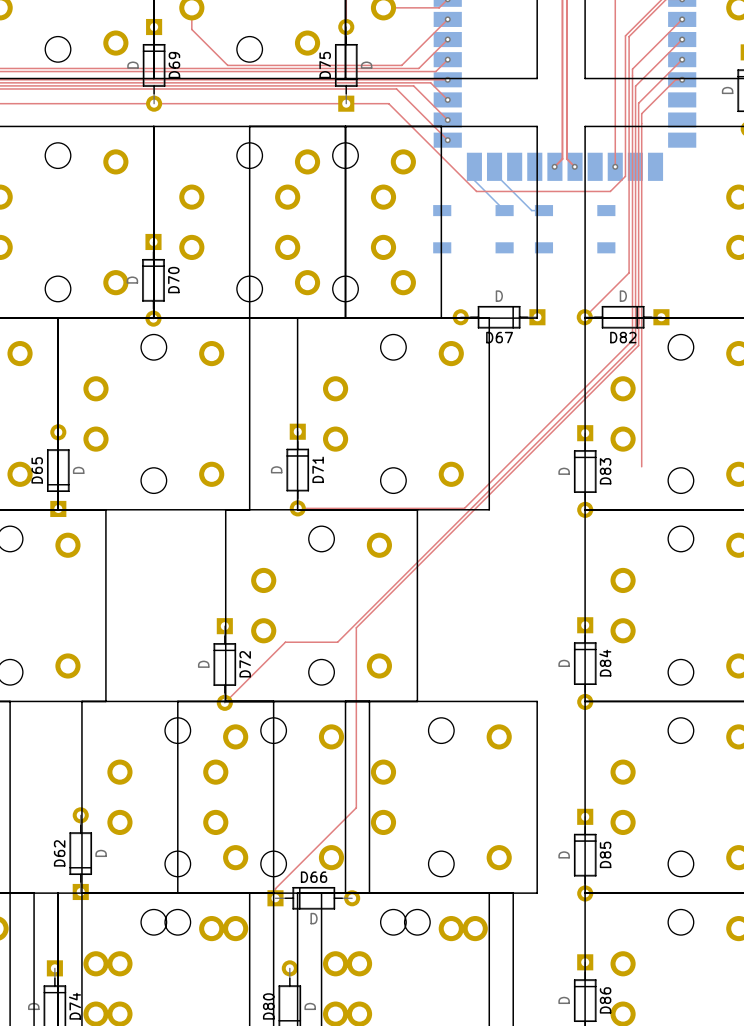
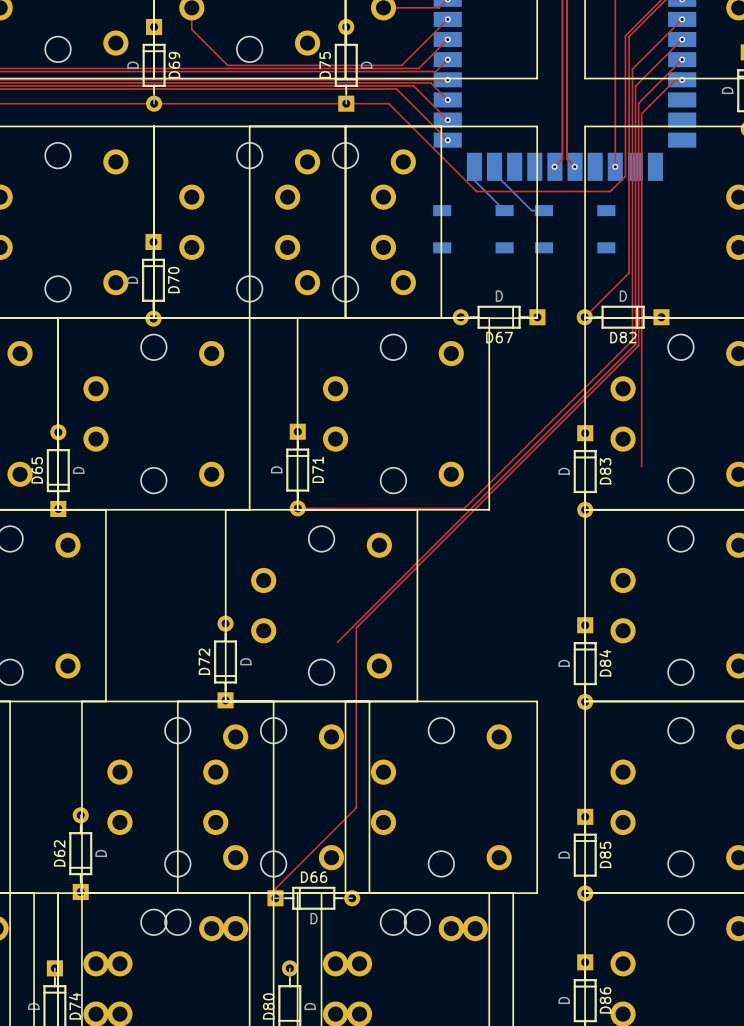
top track: (337, 642) (285, 642) (224, 702) -> none
D72 rotation: 0° (224, 664) -> 180° (225, 661)

